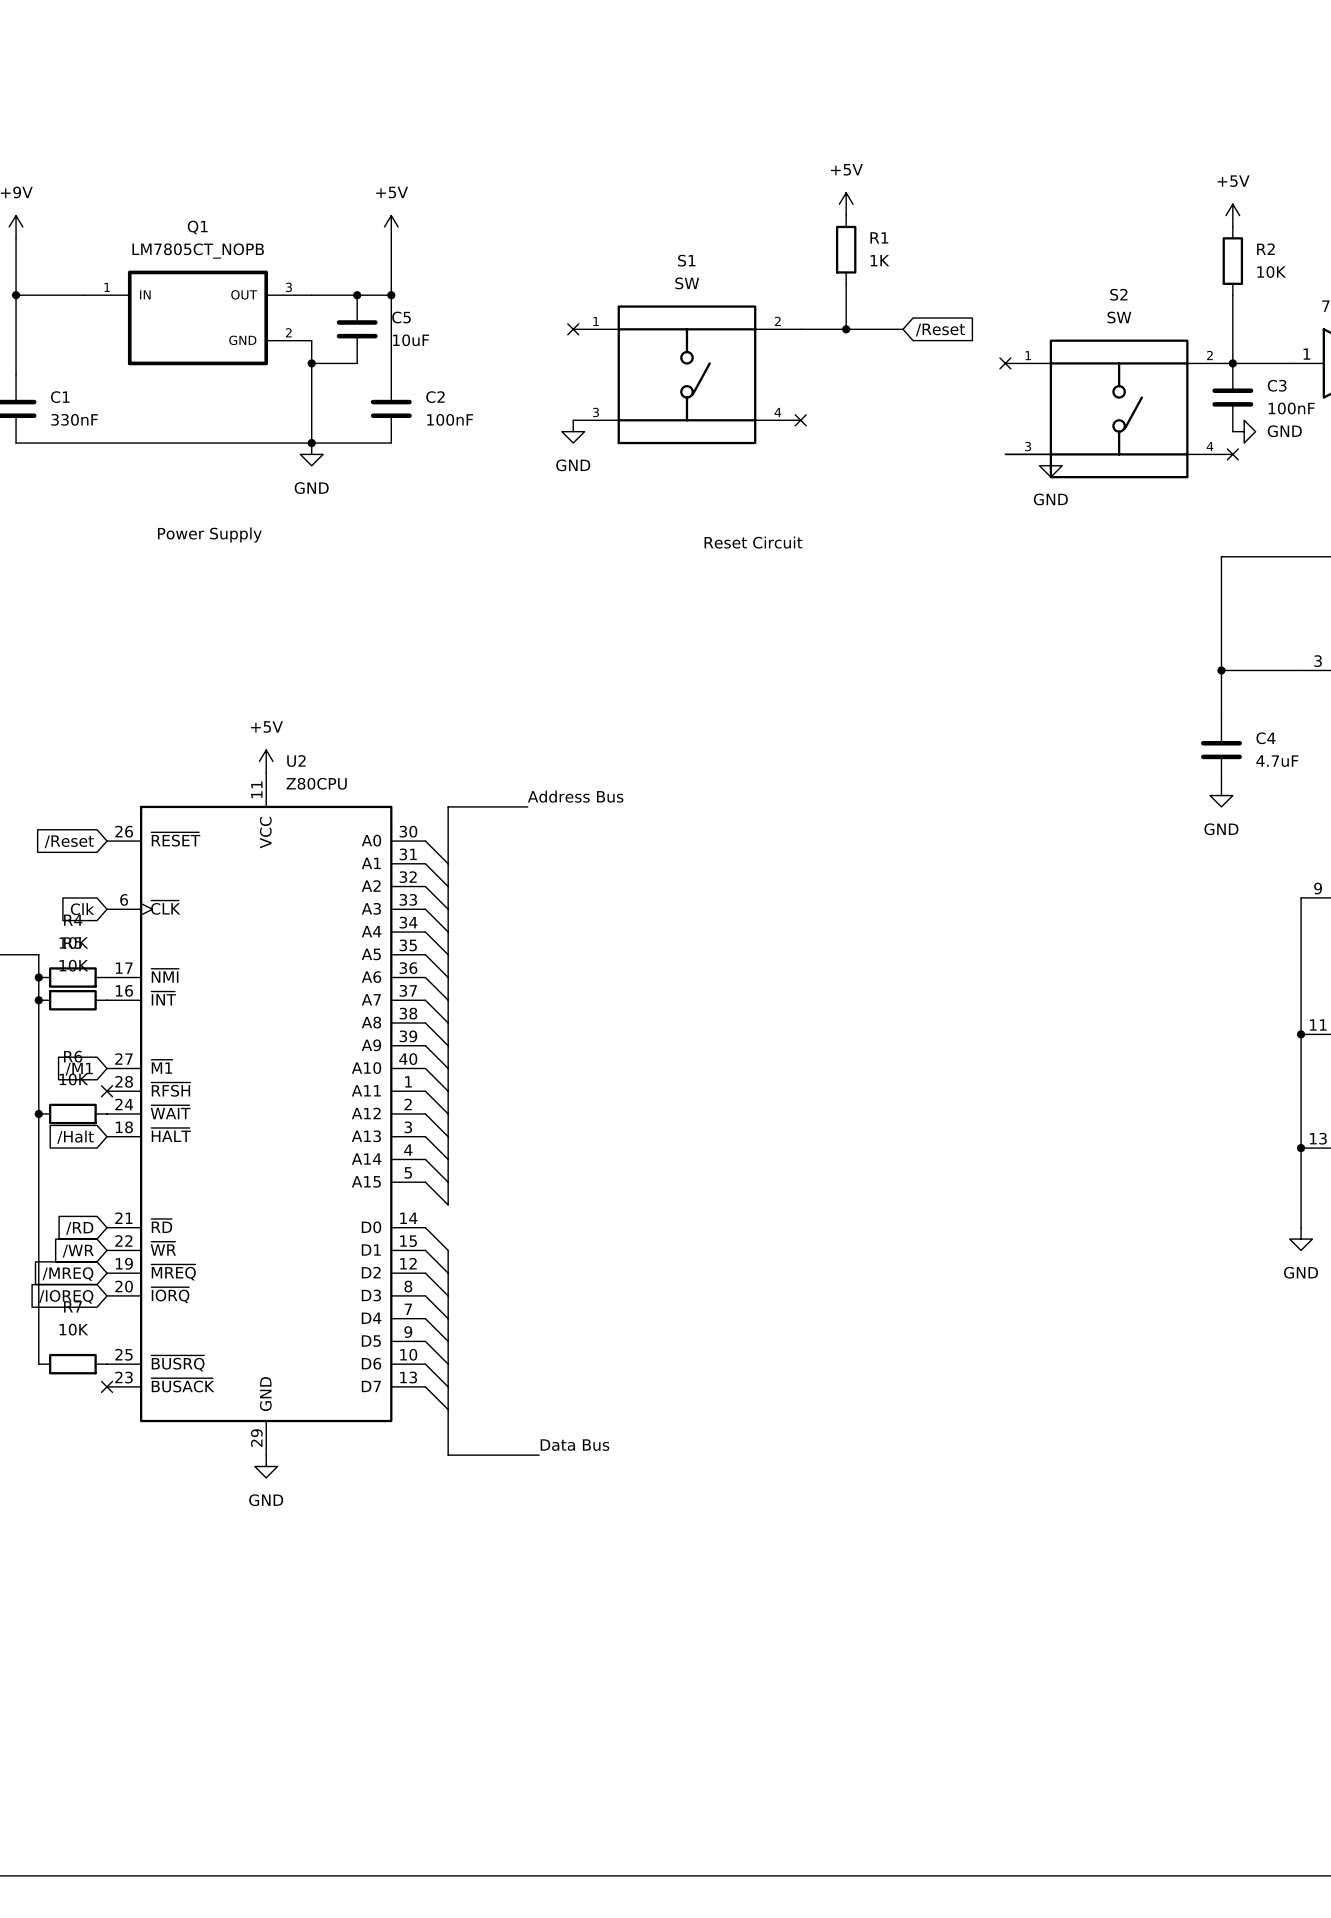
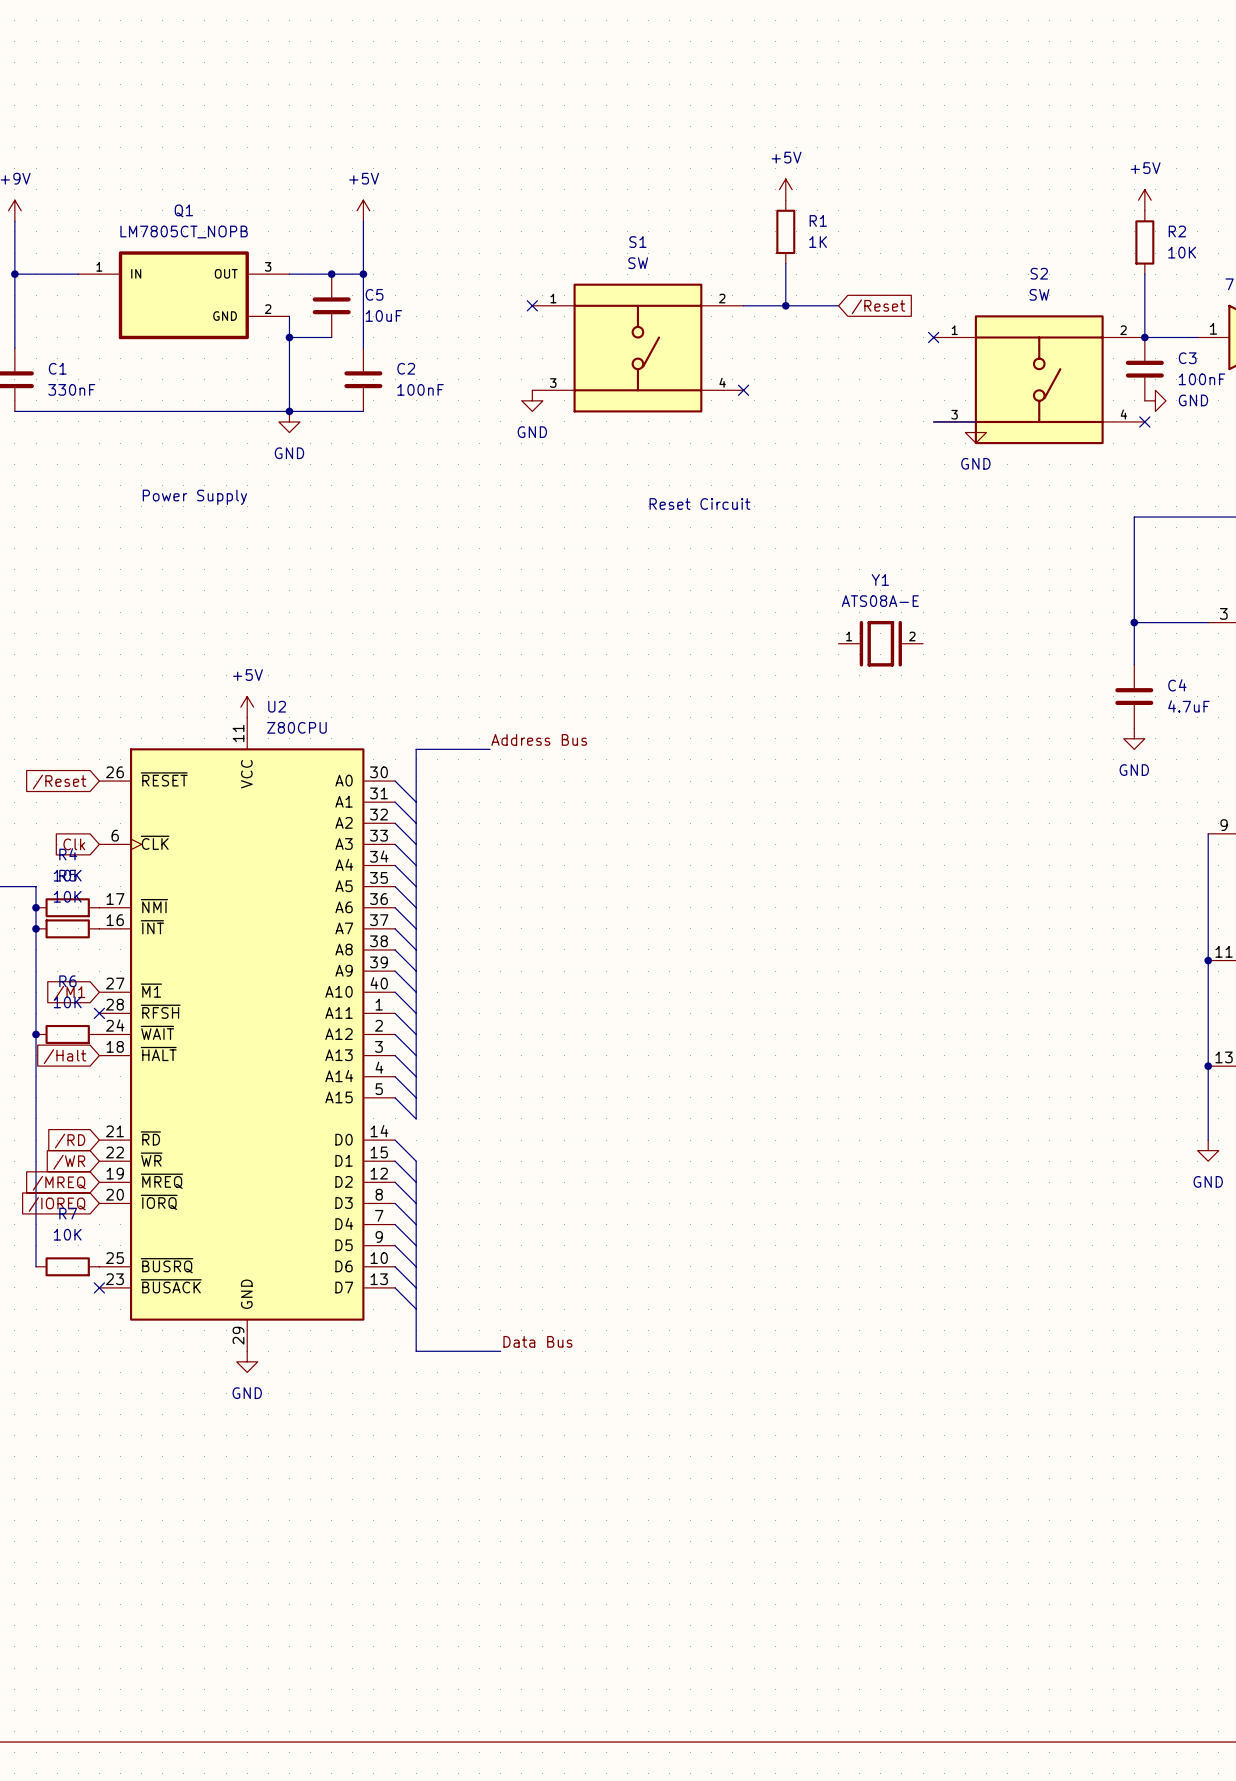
Y1: none -> ATS08A-E (880, 643)

